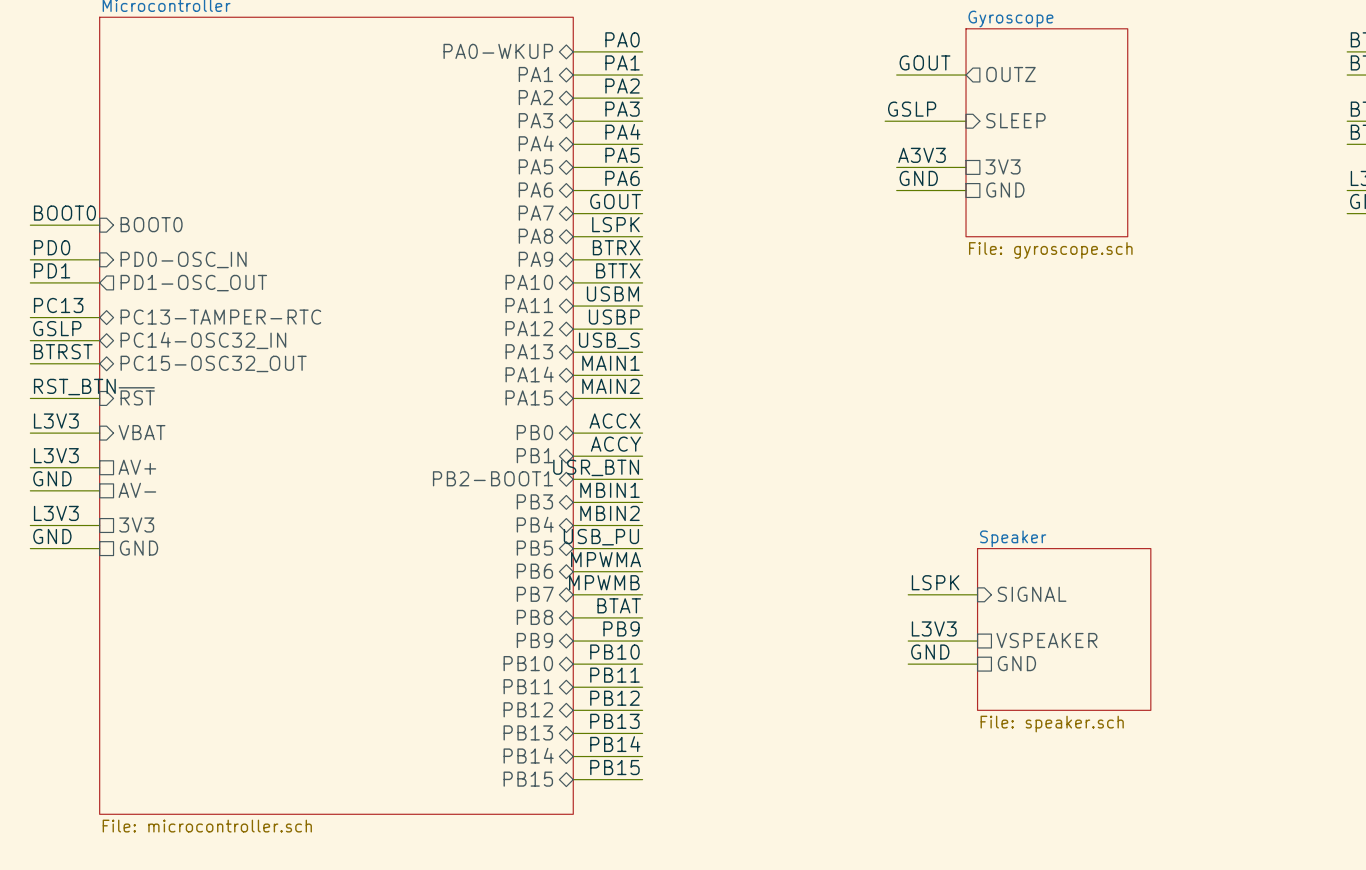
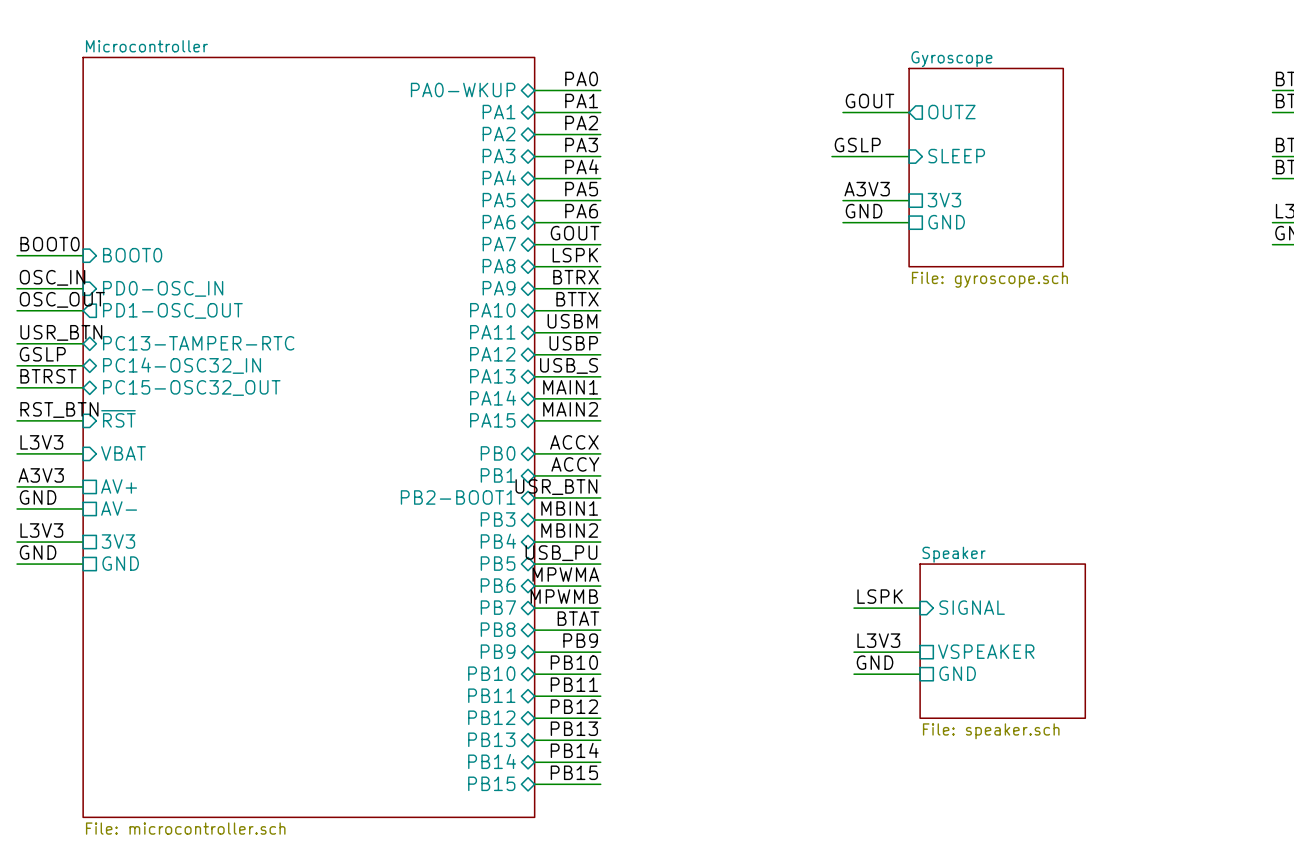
label: PD0 (52, 247) -> OSC_IN (52, 277)
label: PD1 (52, 270) -> OSC_OUT (62, 299)
label: PC13 (58, 305) -> USR_BTN (61, 332)
label: L3V3 (56, 455) -> A3V3 (41, 475)

